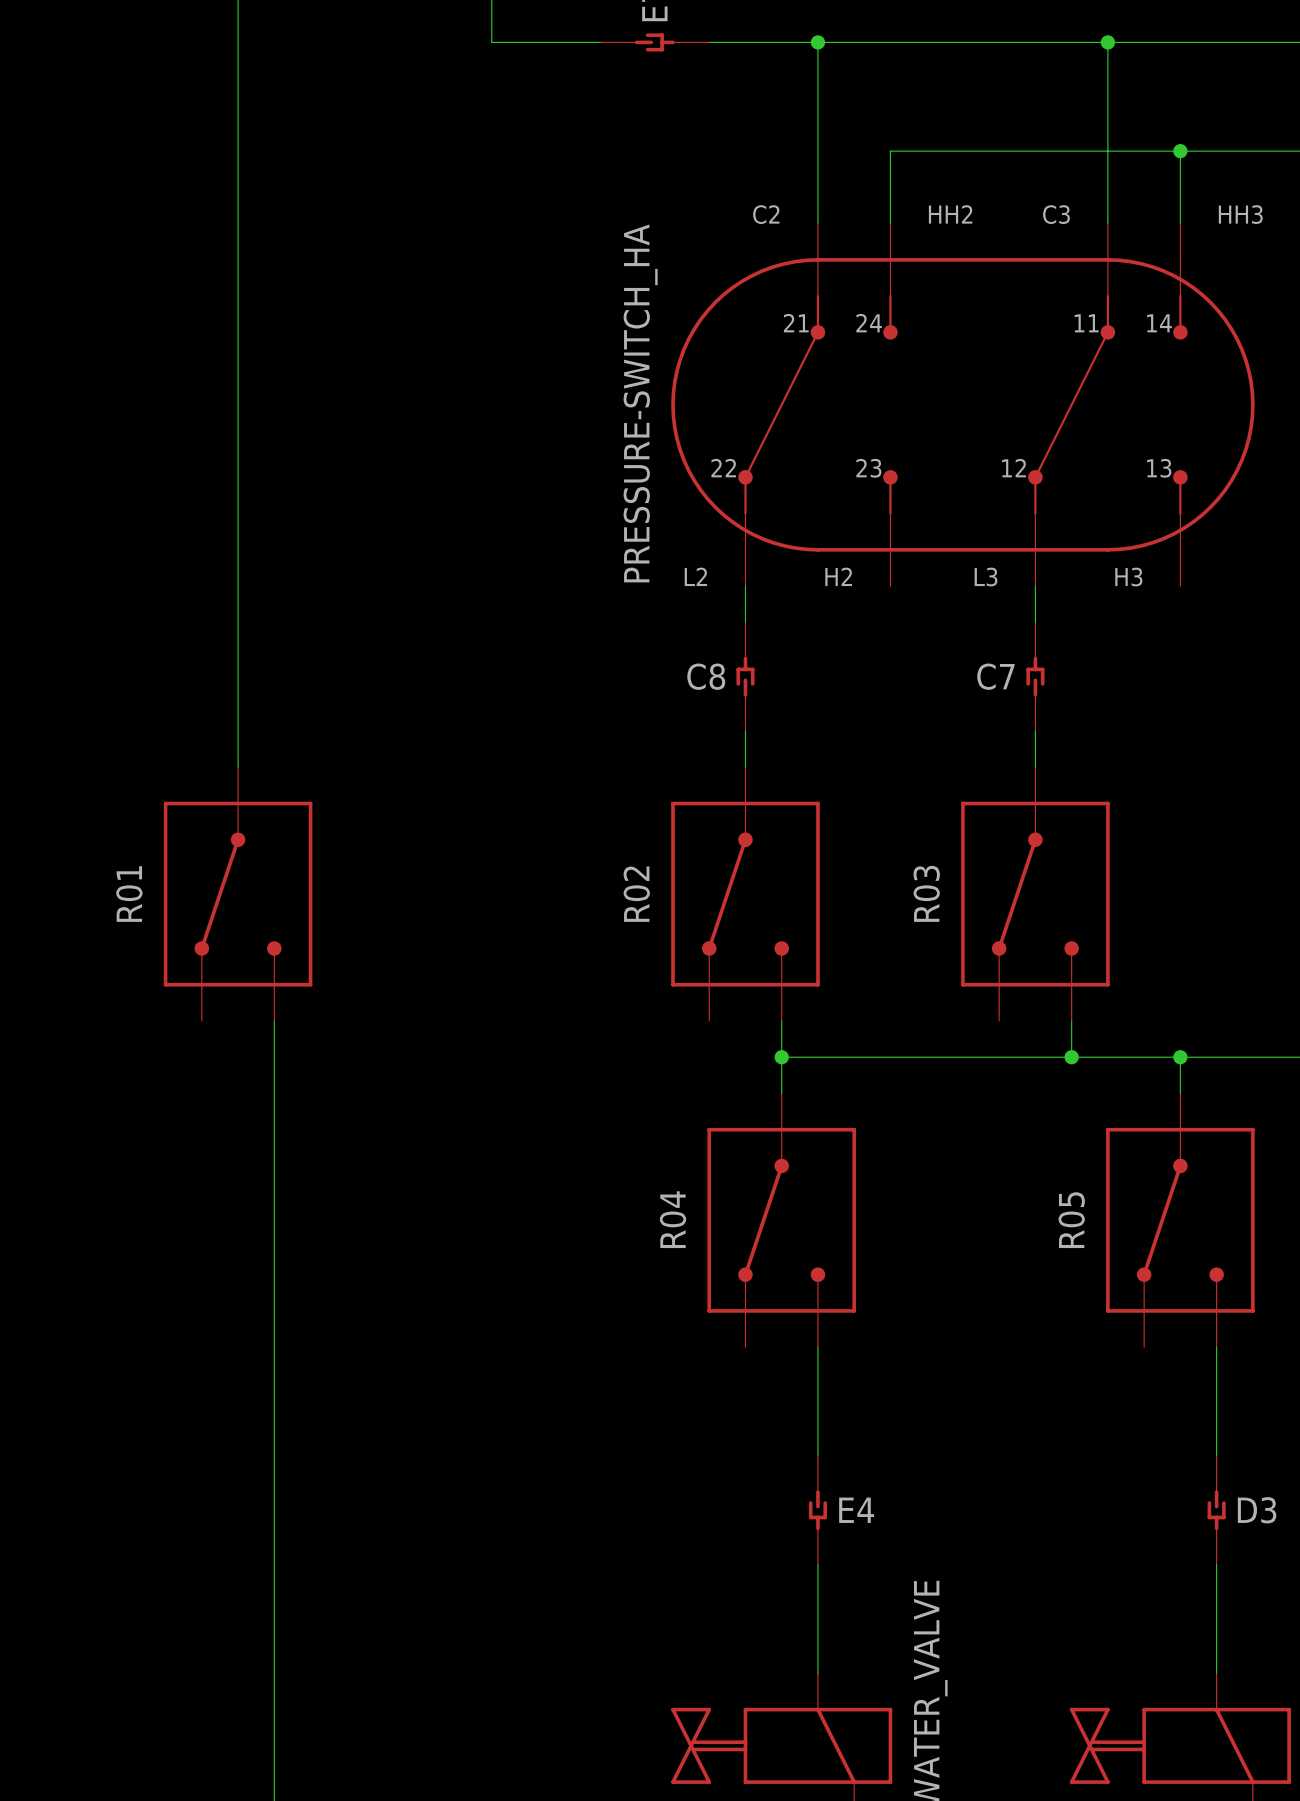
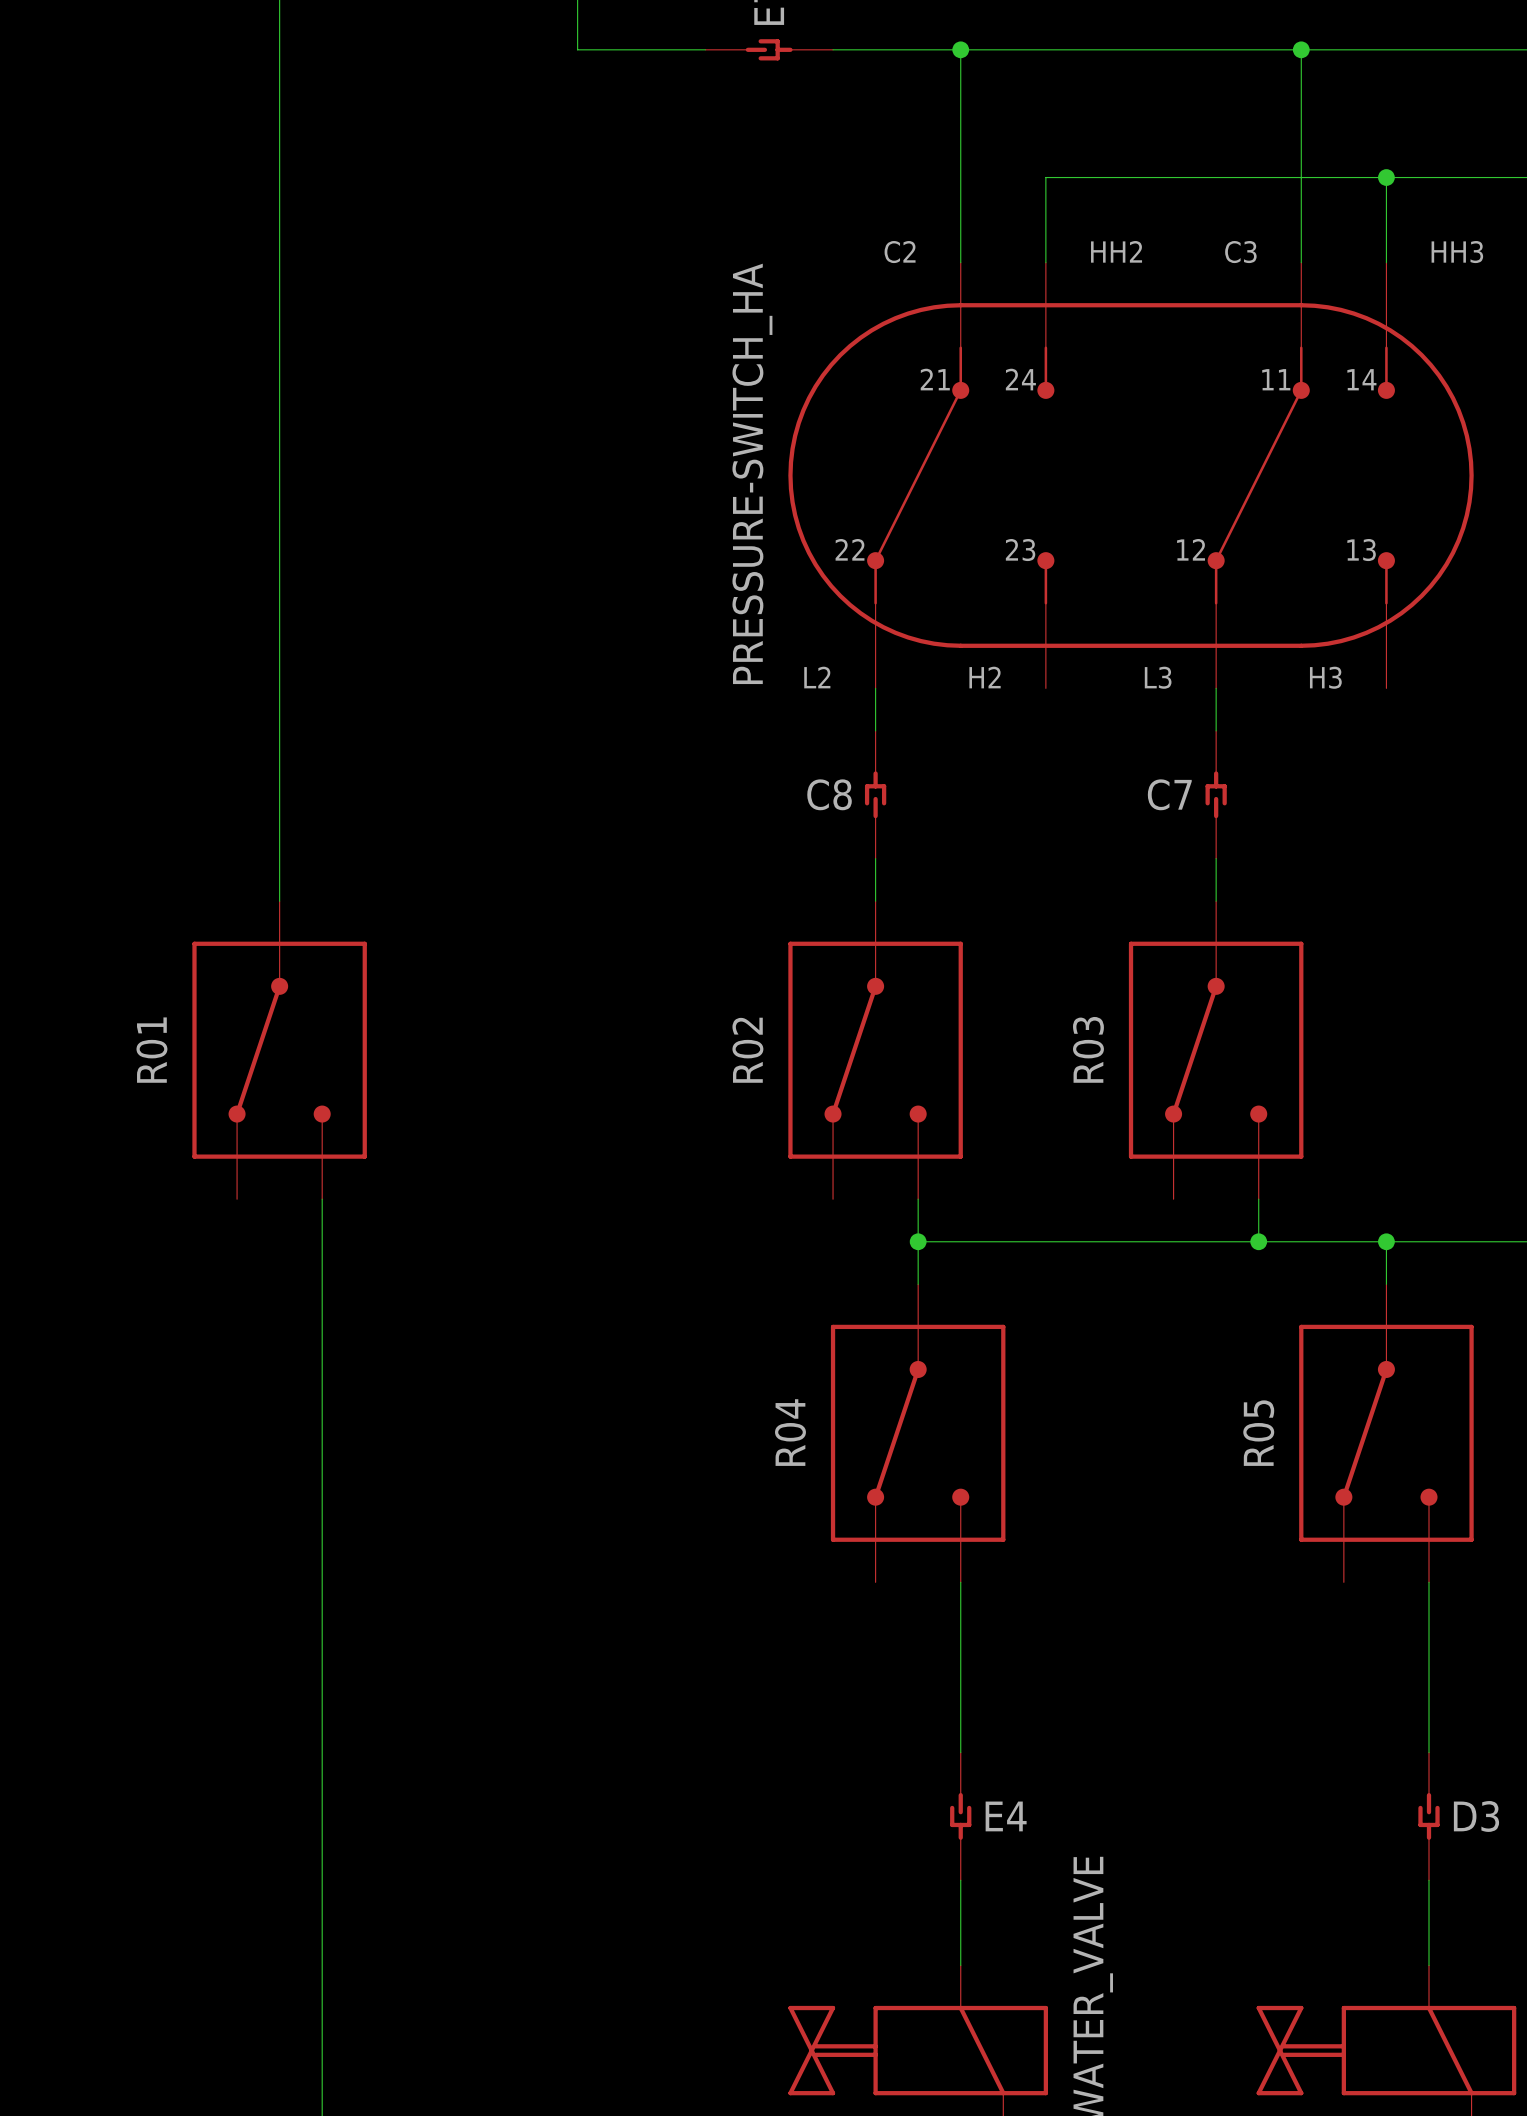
E4 position: (817, 1510) -> (960, 1816)
D3 position: (1216, 1510) -> (1429, 1816)

